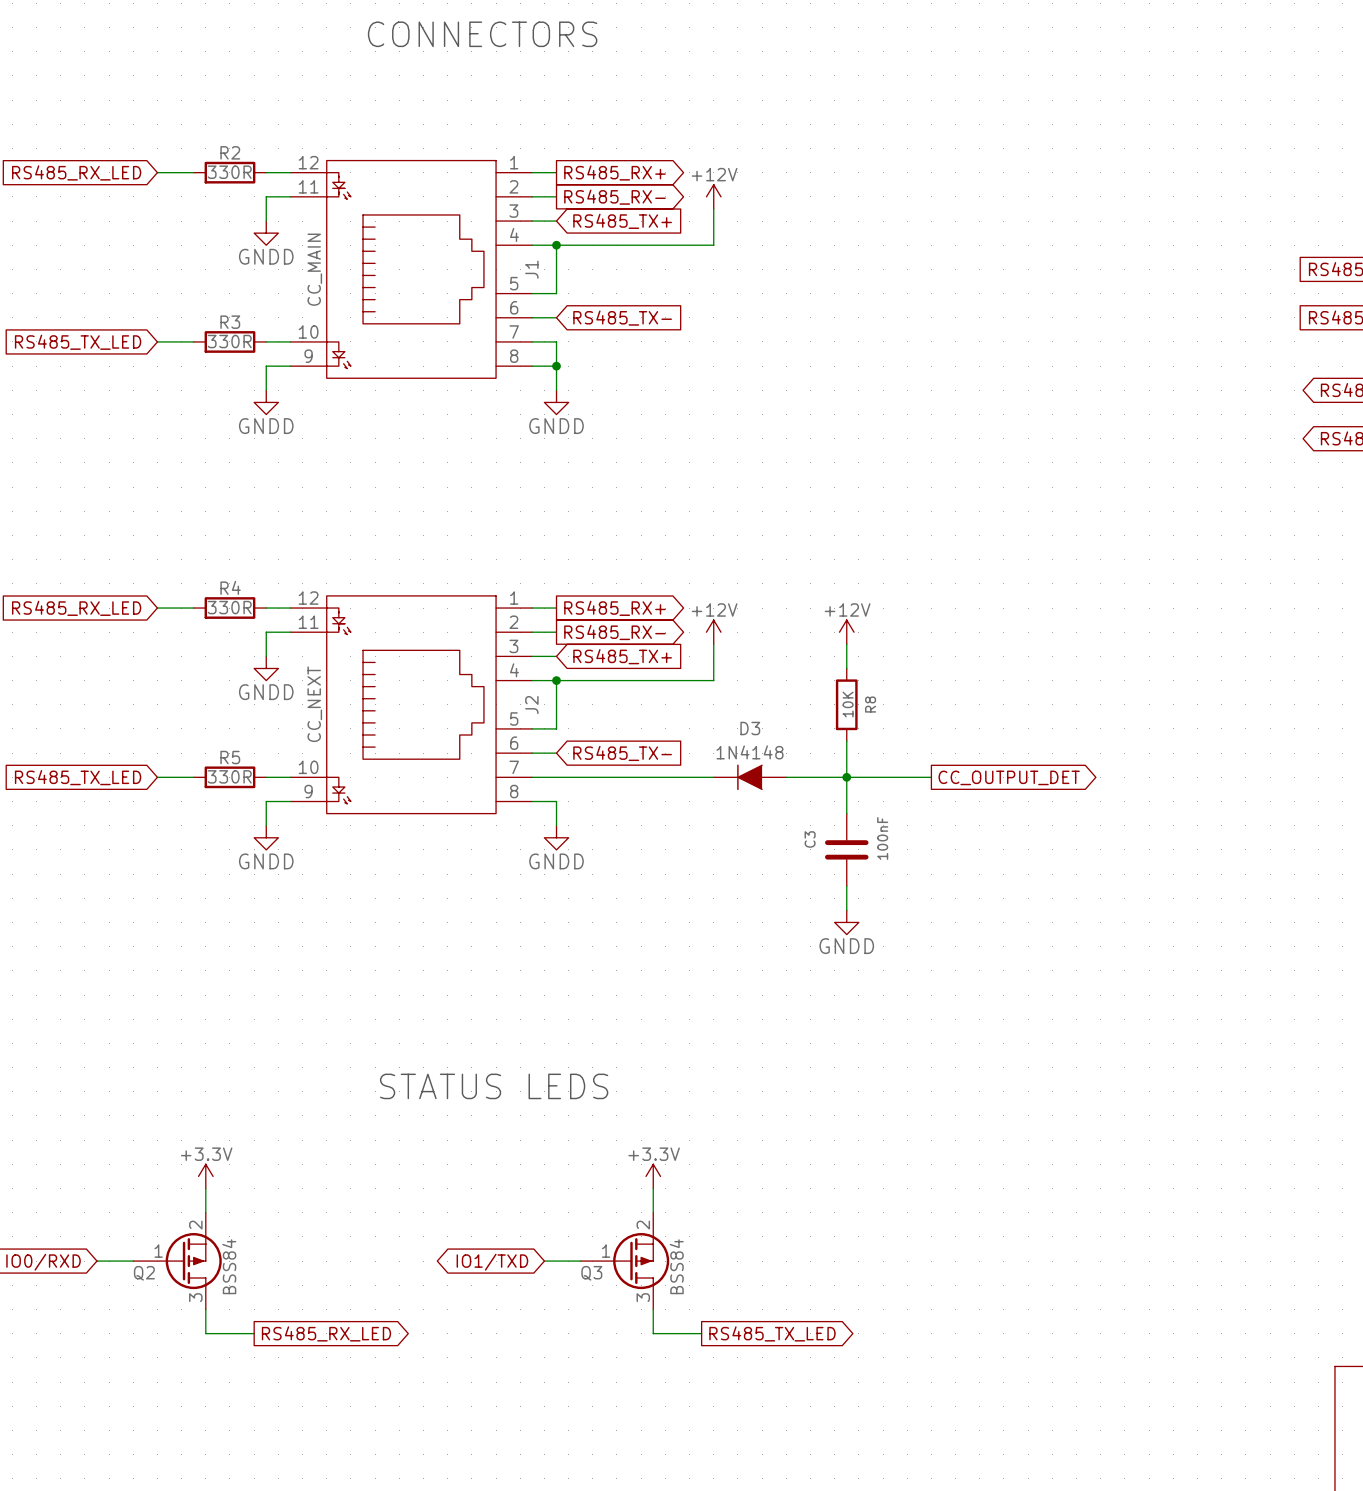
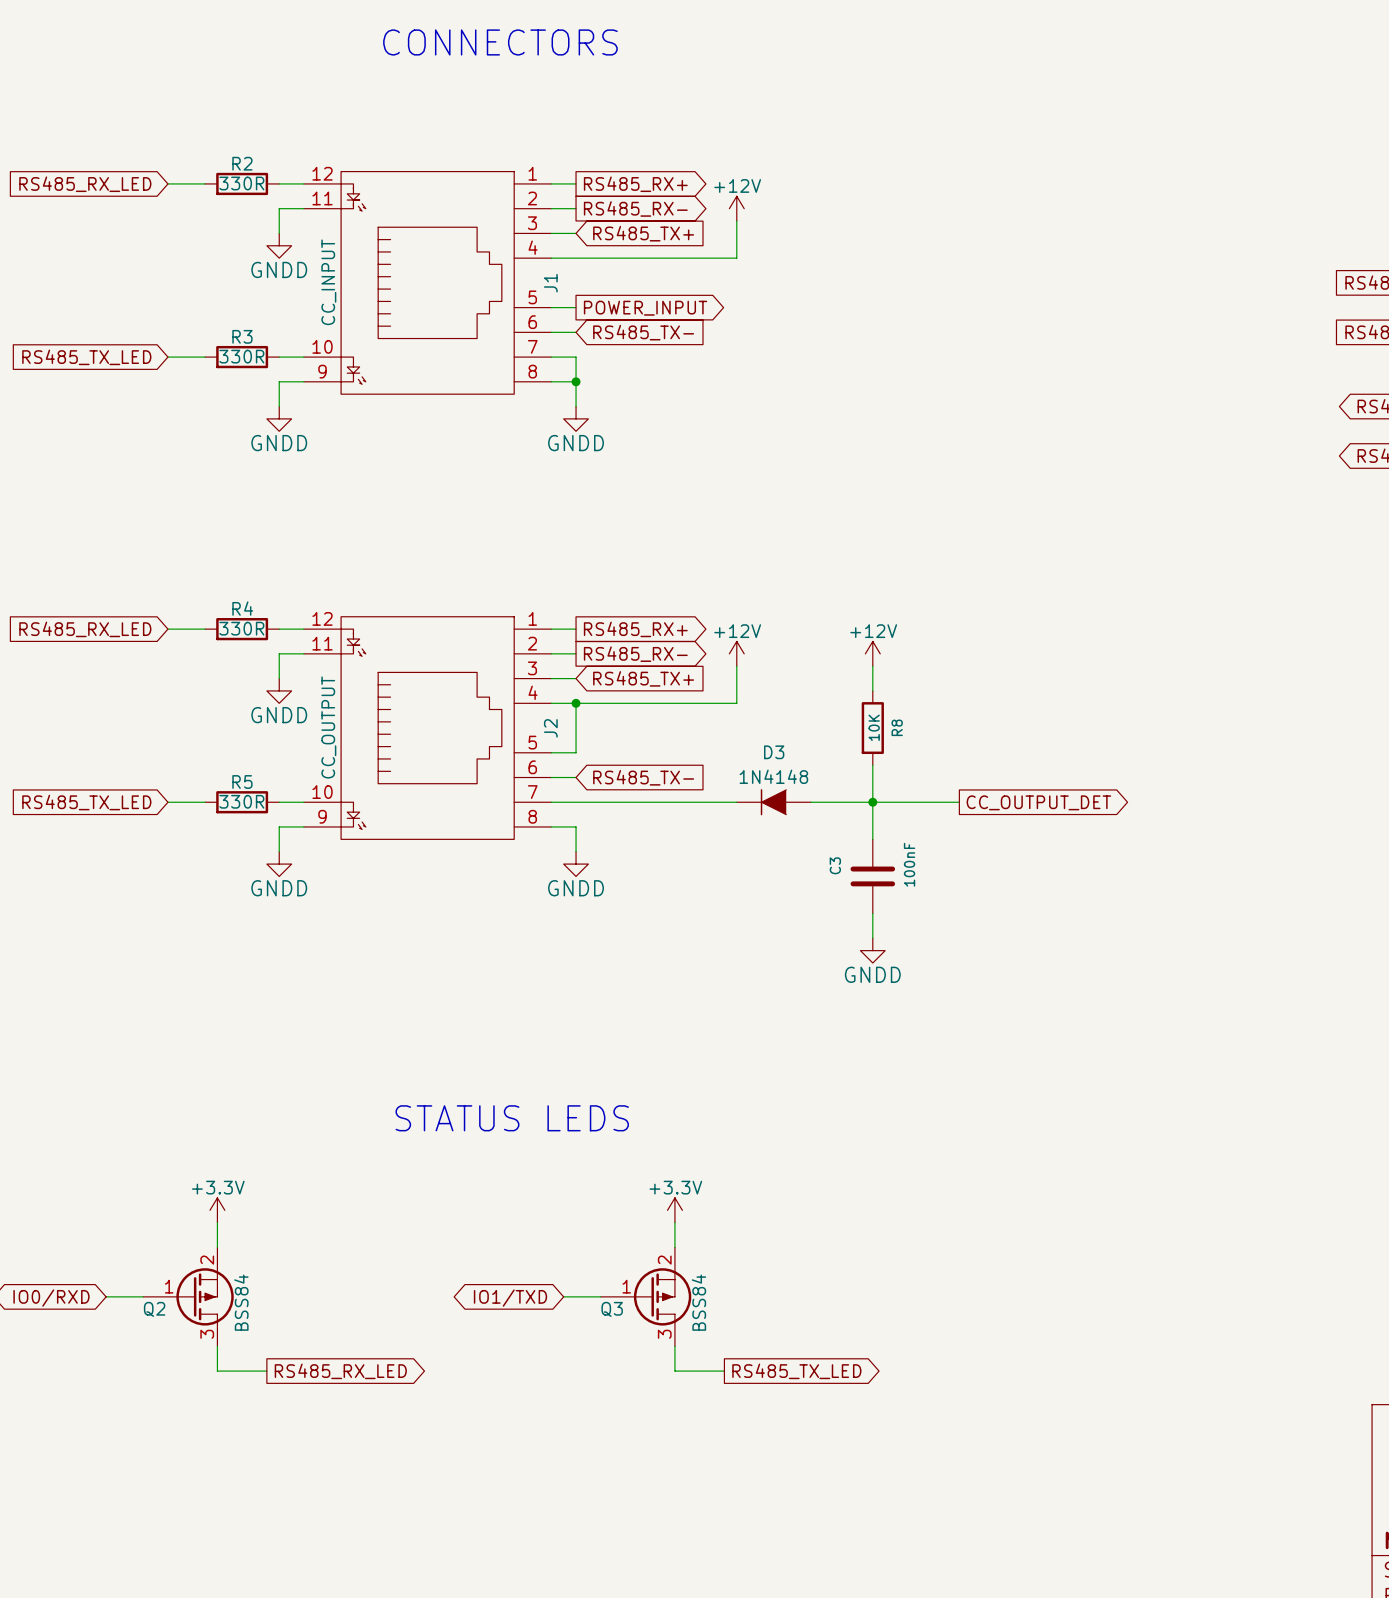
wire: (556, 245) (556, 293) -> none
junction: (556, 245) -> none
J1 value: CC_MAIN (314, 269) -> CC_INPUT (328, 282)
global label: none -> POWER_INPUT (645, 308)
J2 value: CC_NEXT (314, 704) -> CC_OUTPUT (328, 727)

